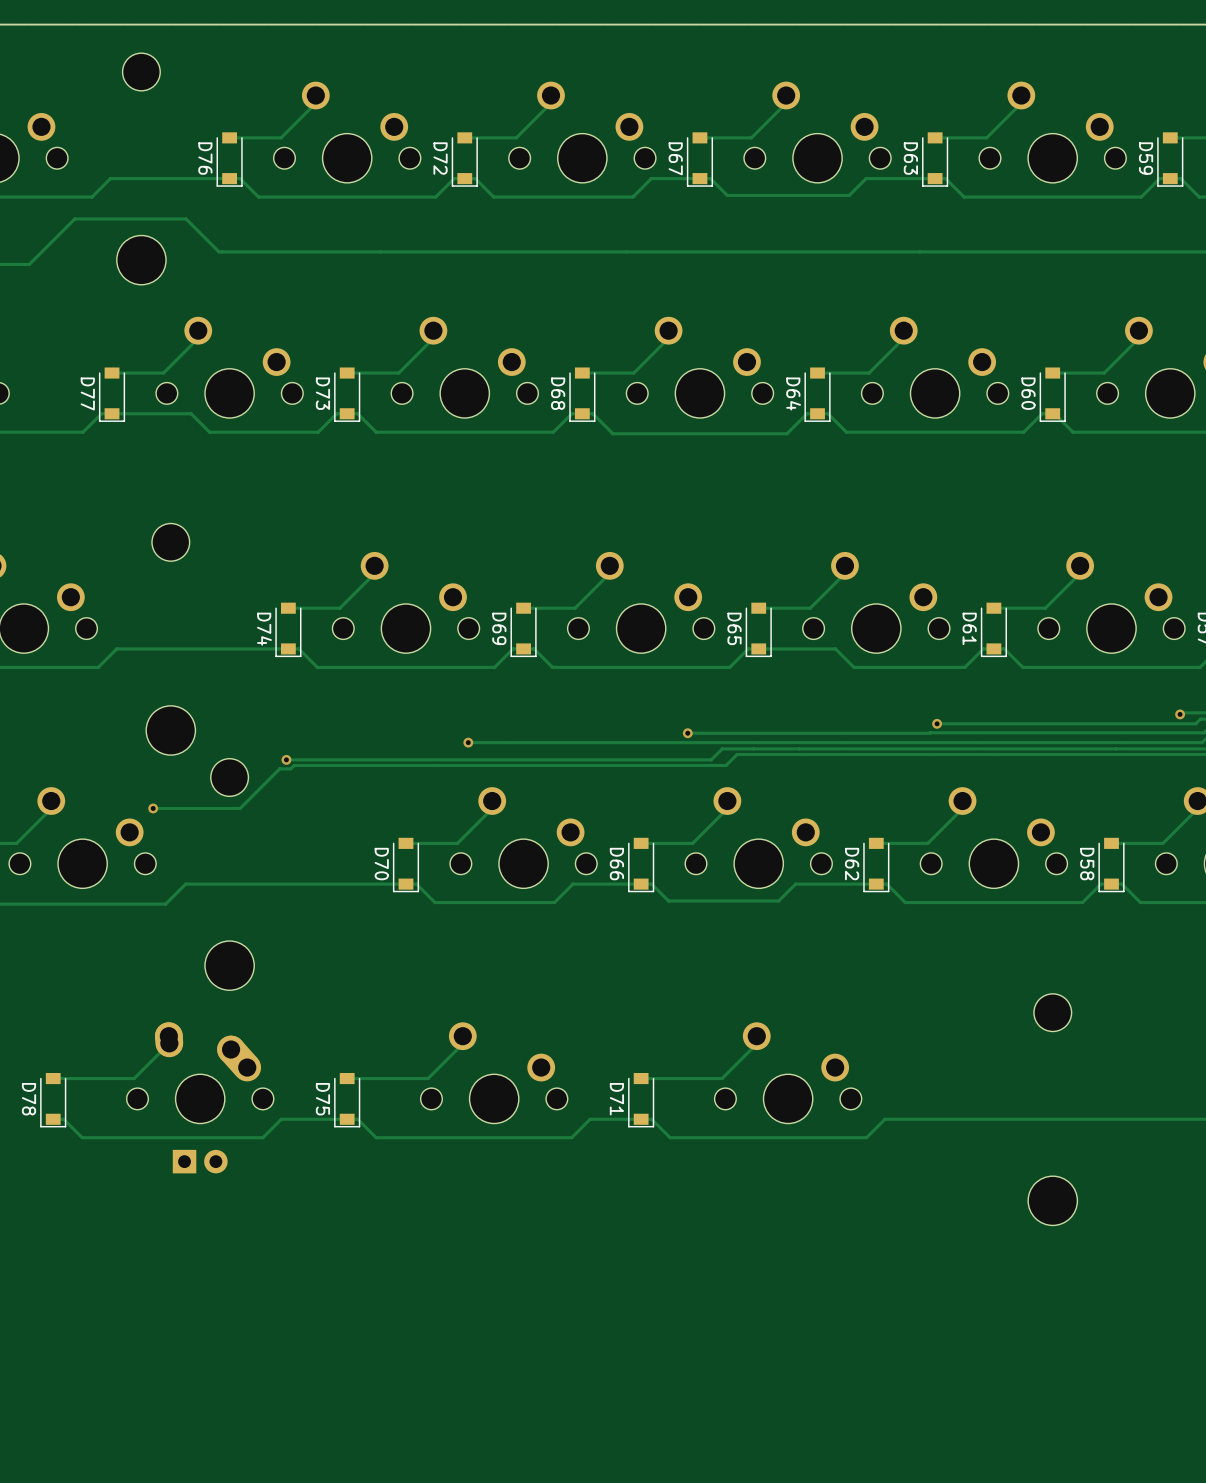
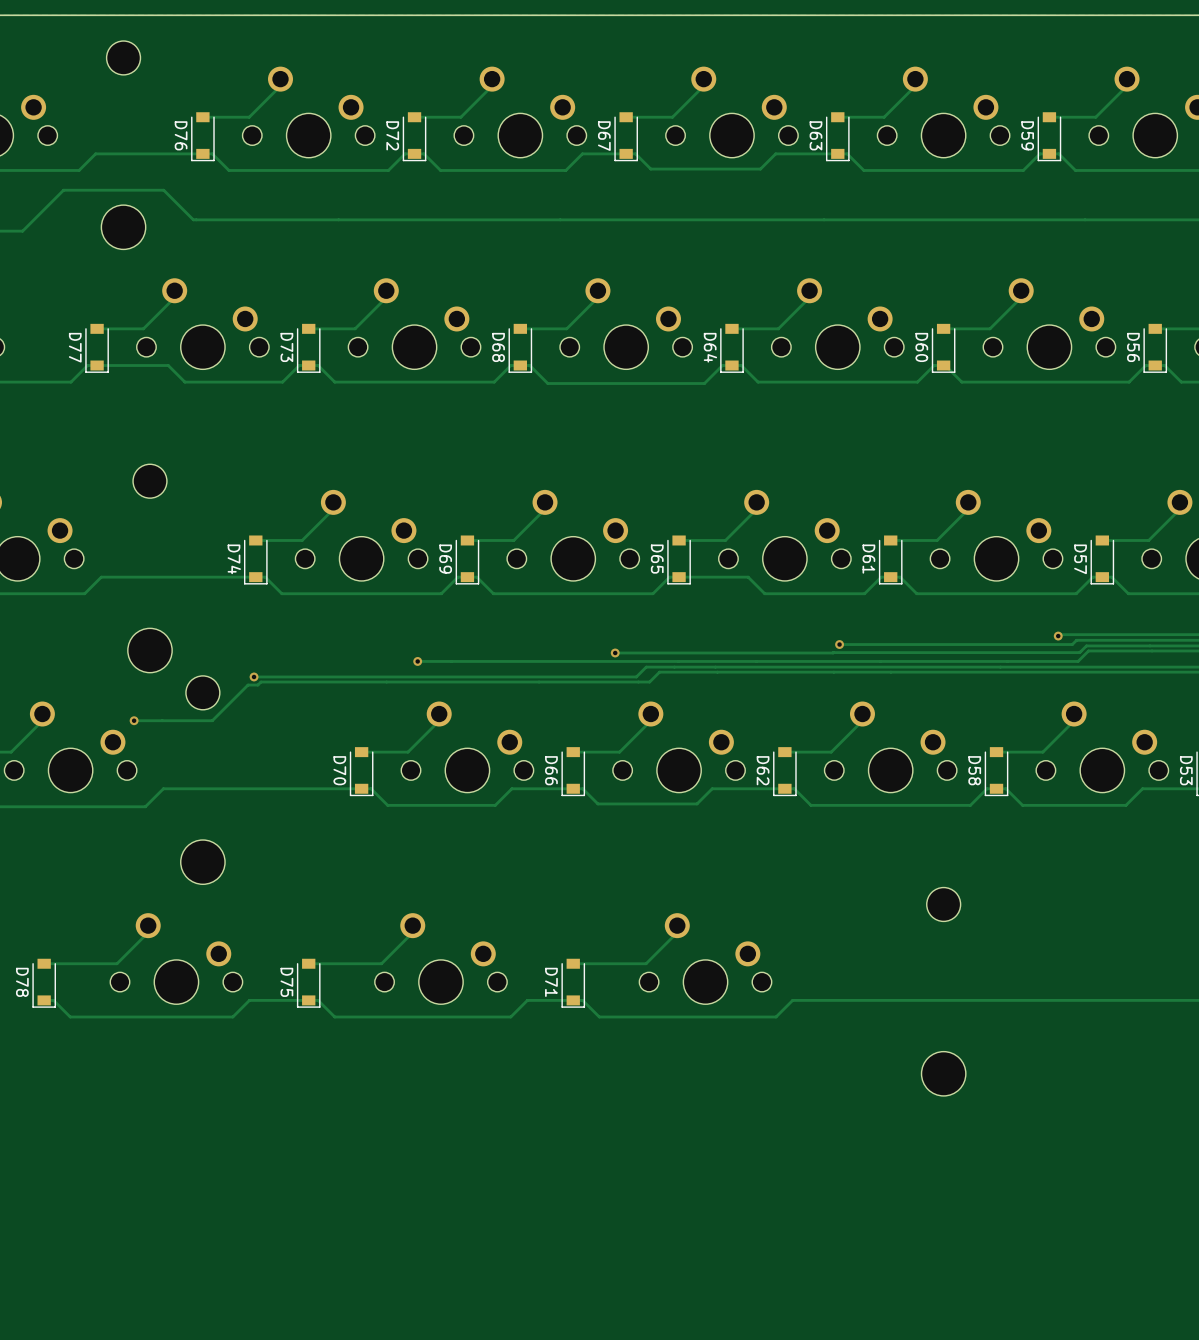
part: none -> (176, 958)
part: (200, 1097) -> none

